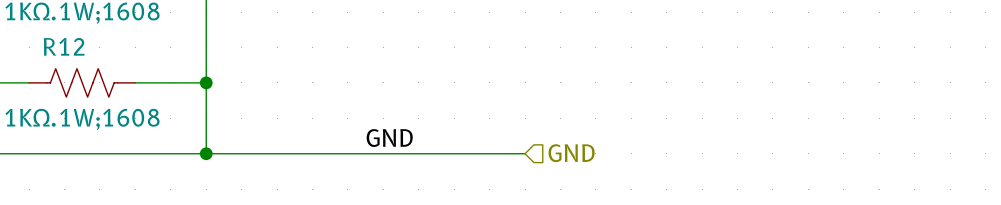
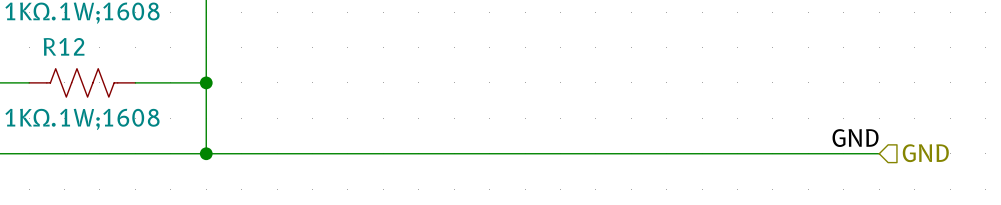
label: GND (389, 138) -> none
label: none -> GND (855, 138)
wire: none -> (525, 153) (879, 153)
hierarchical label: GND (571, 153) -> none
hierarchical label: none -> GND (925, 153)

